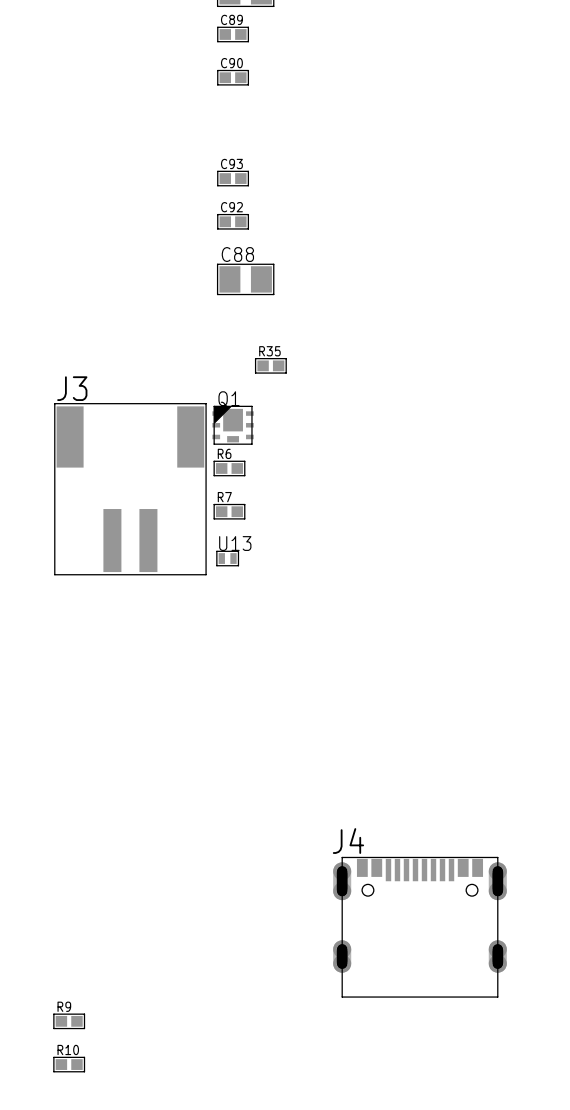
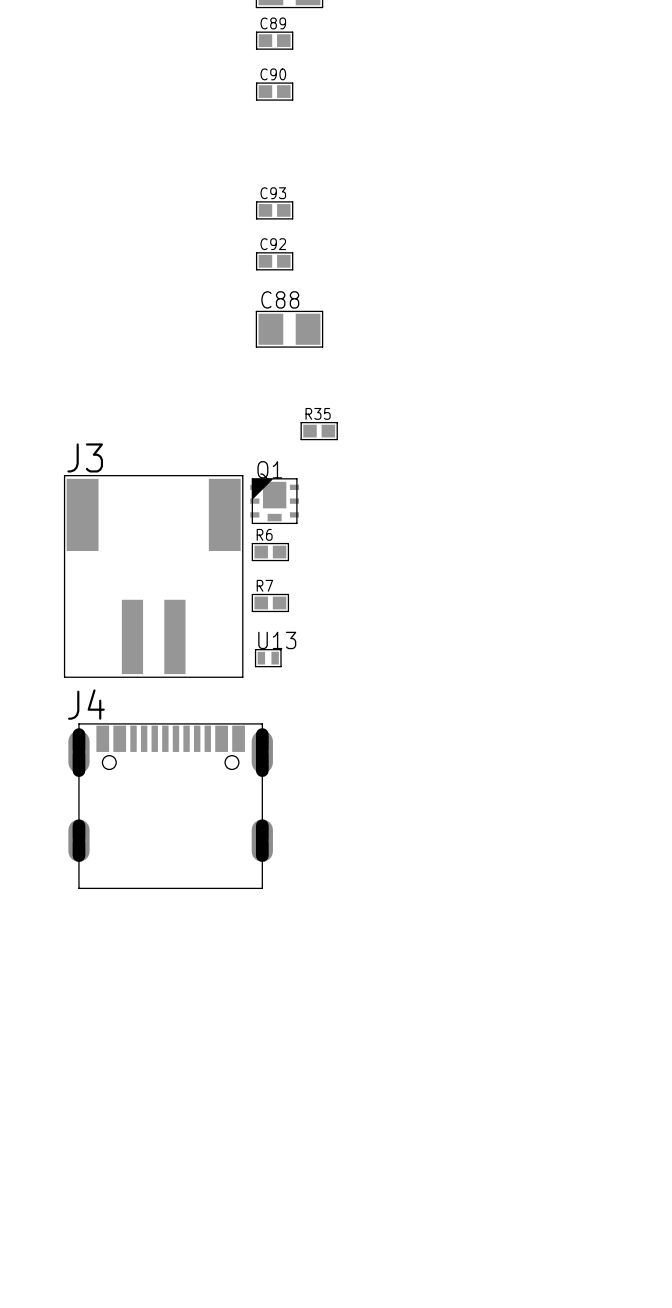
J4 footprint: [333, 857, 507, 998] -> [68, 723, 273, 889]
R9: (69, 1021) -> none
R10: (69, 1064) -> none

